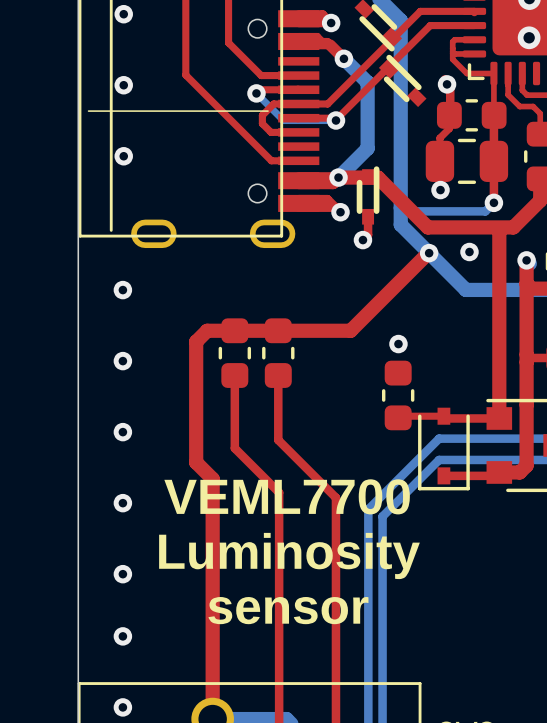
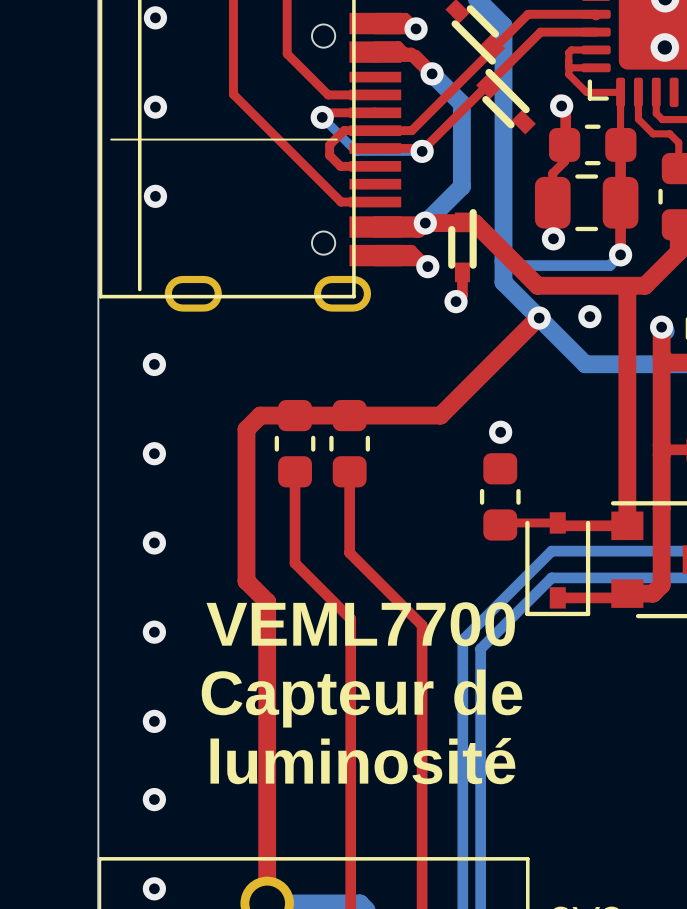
text: Luminosity (289, 555) -> Capteur de (362, 698)
text: sensor (288, 610) -> luminosité (362, 761)

